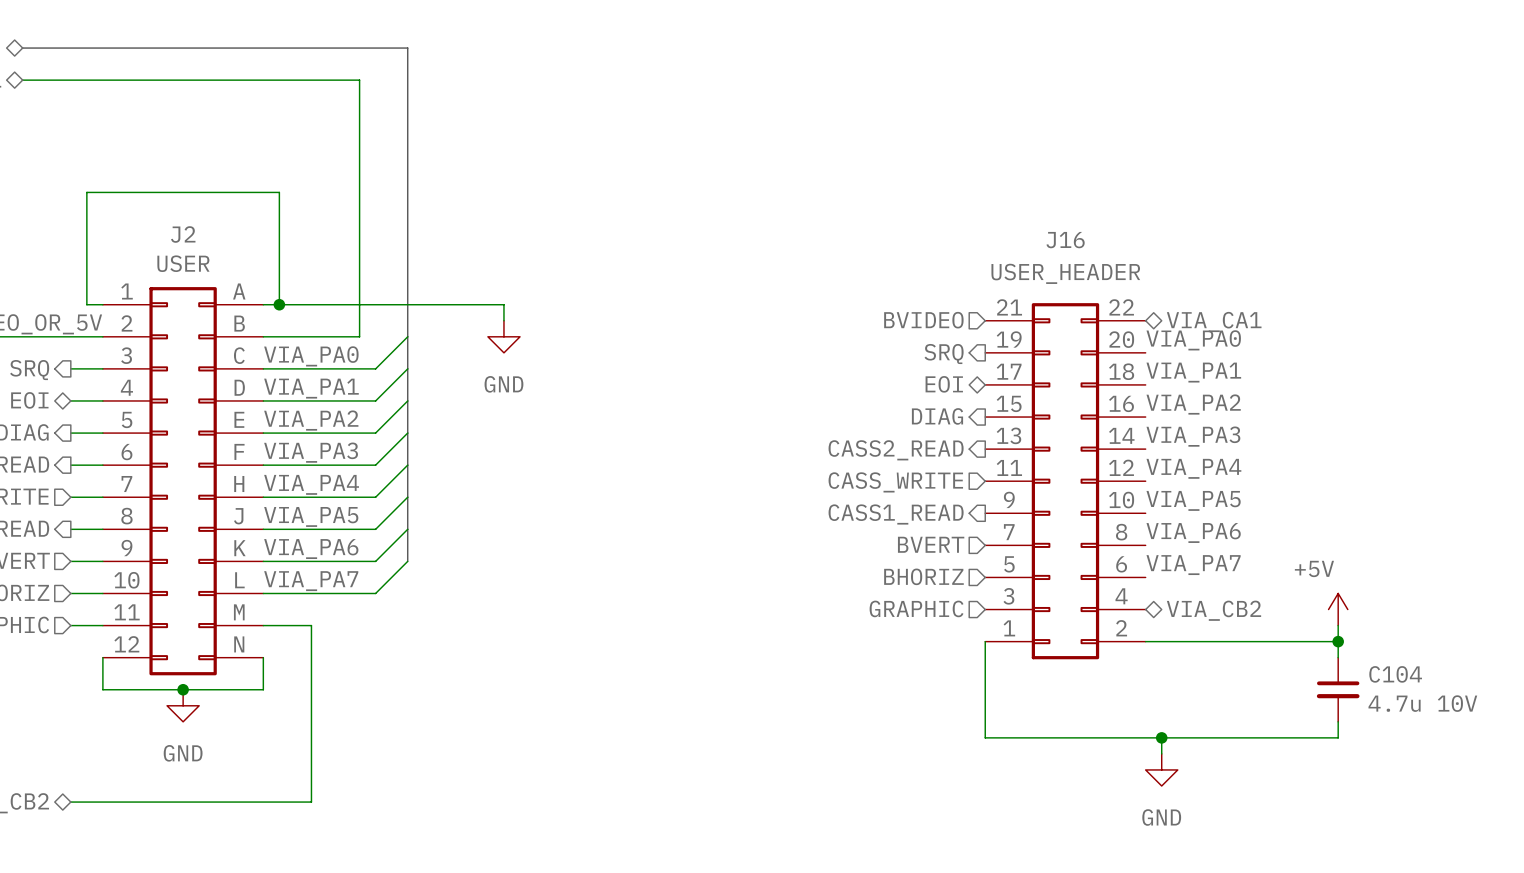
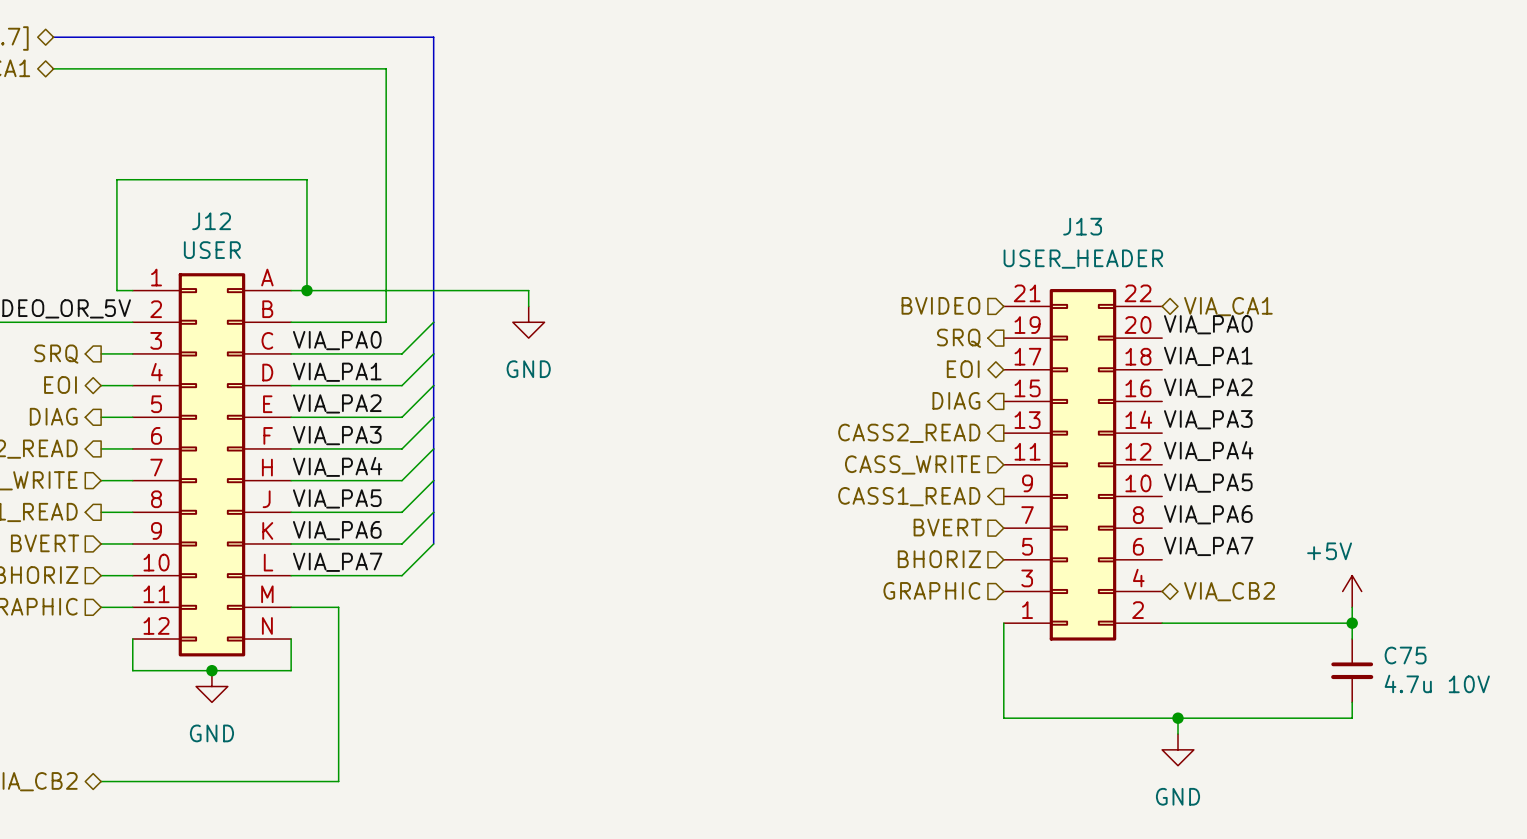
J2 name: J2 (183, 234) -> J12 (211, 221)
J16 name: J16 (1065, 240) -> J13 (1082, 226)
C104 name: C104 (1395, 674) -> C75 (1405, 655)

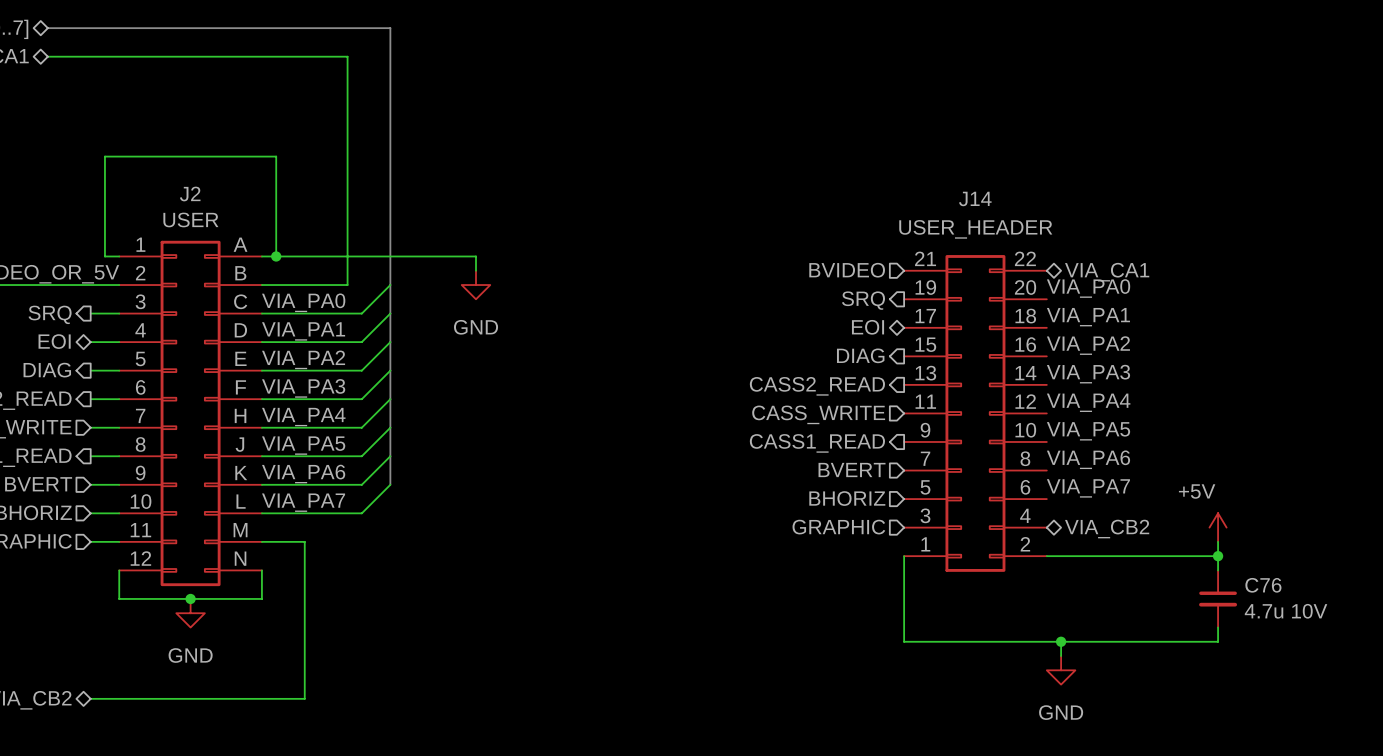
J12 name: J12 (211, 221) -> J2 (190, 194)
J13 name: J13 (1082, 226) -> J14 (975, 198)
C75 name: C75 (1405, 655) -> C76 (1263, 585)

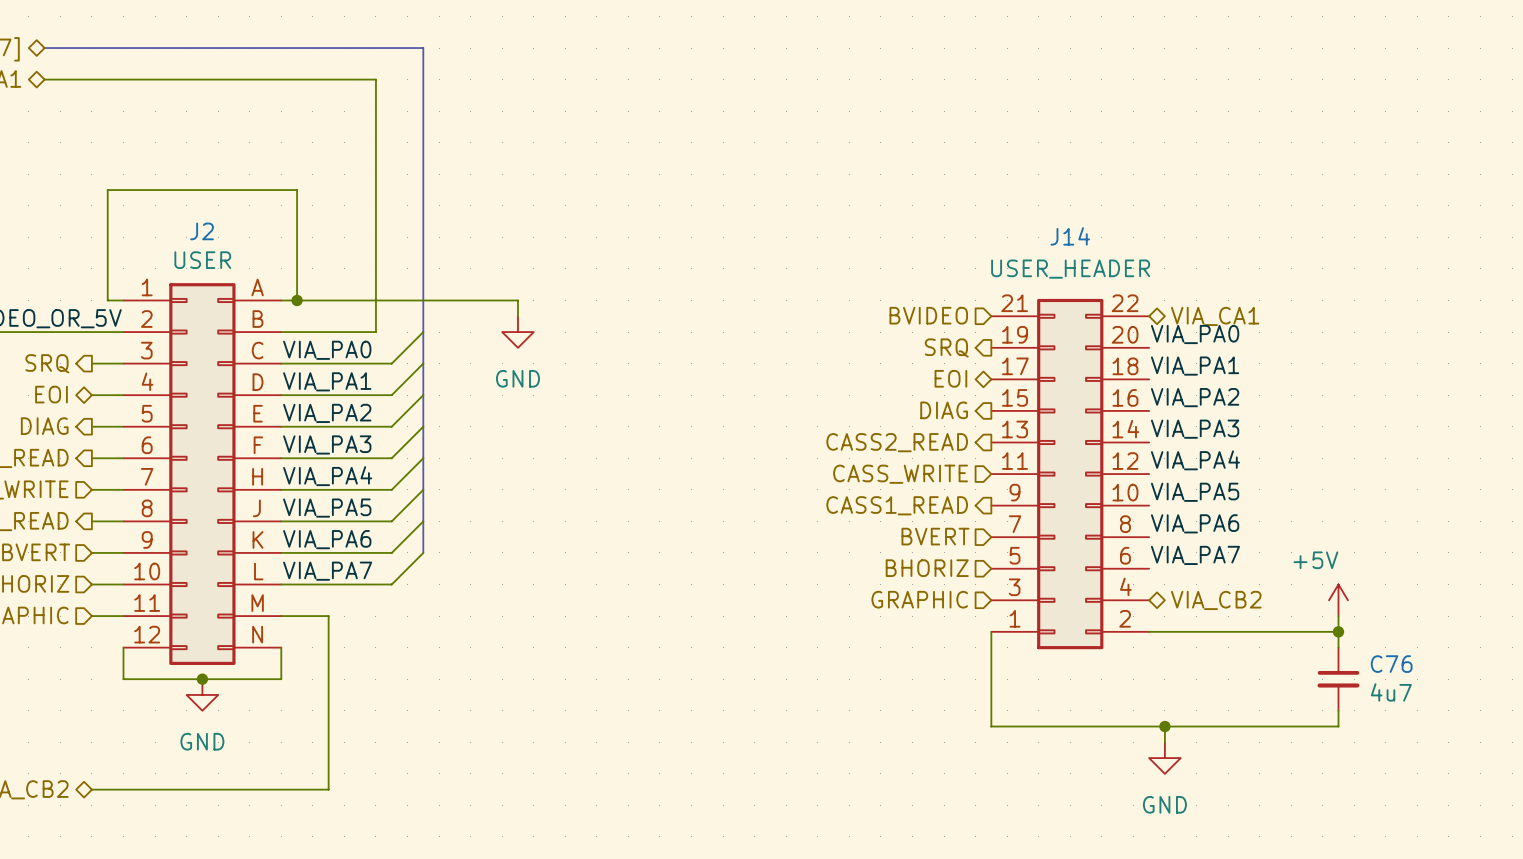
C76 value: 4.7u 10V (1286, 611) -> 4u7 (1391, 692)

